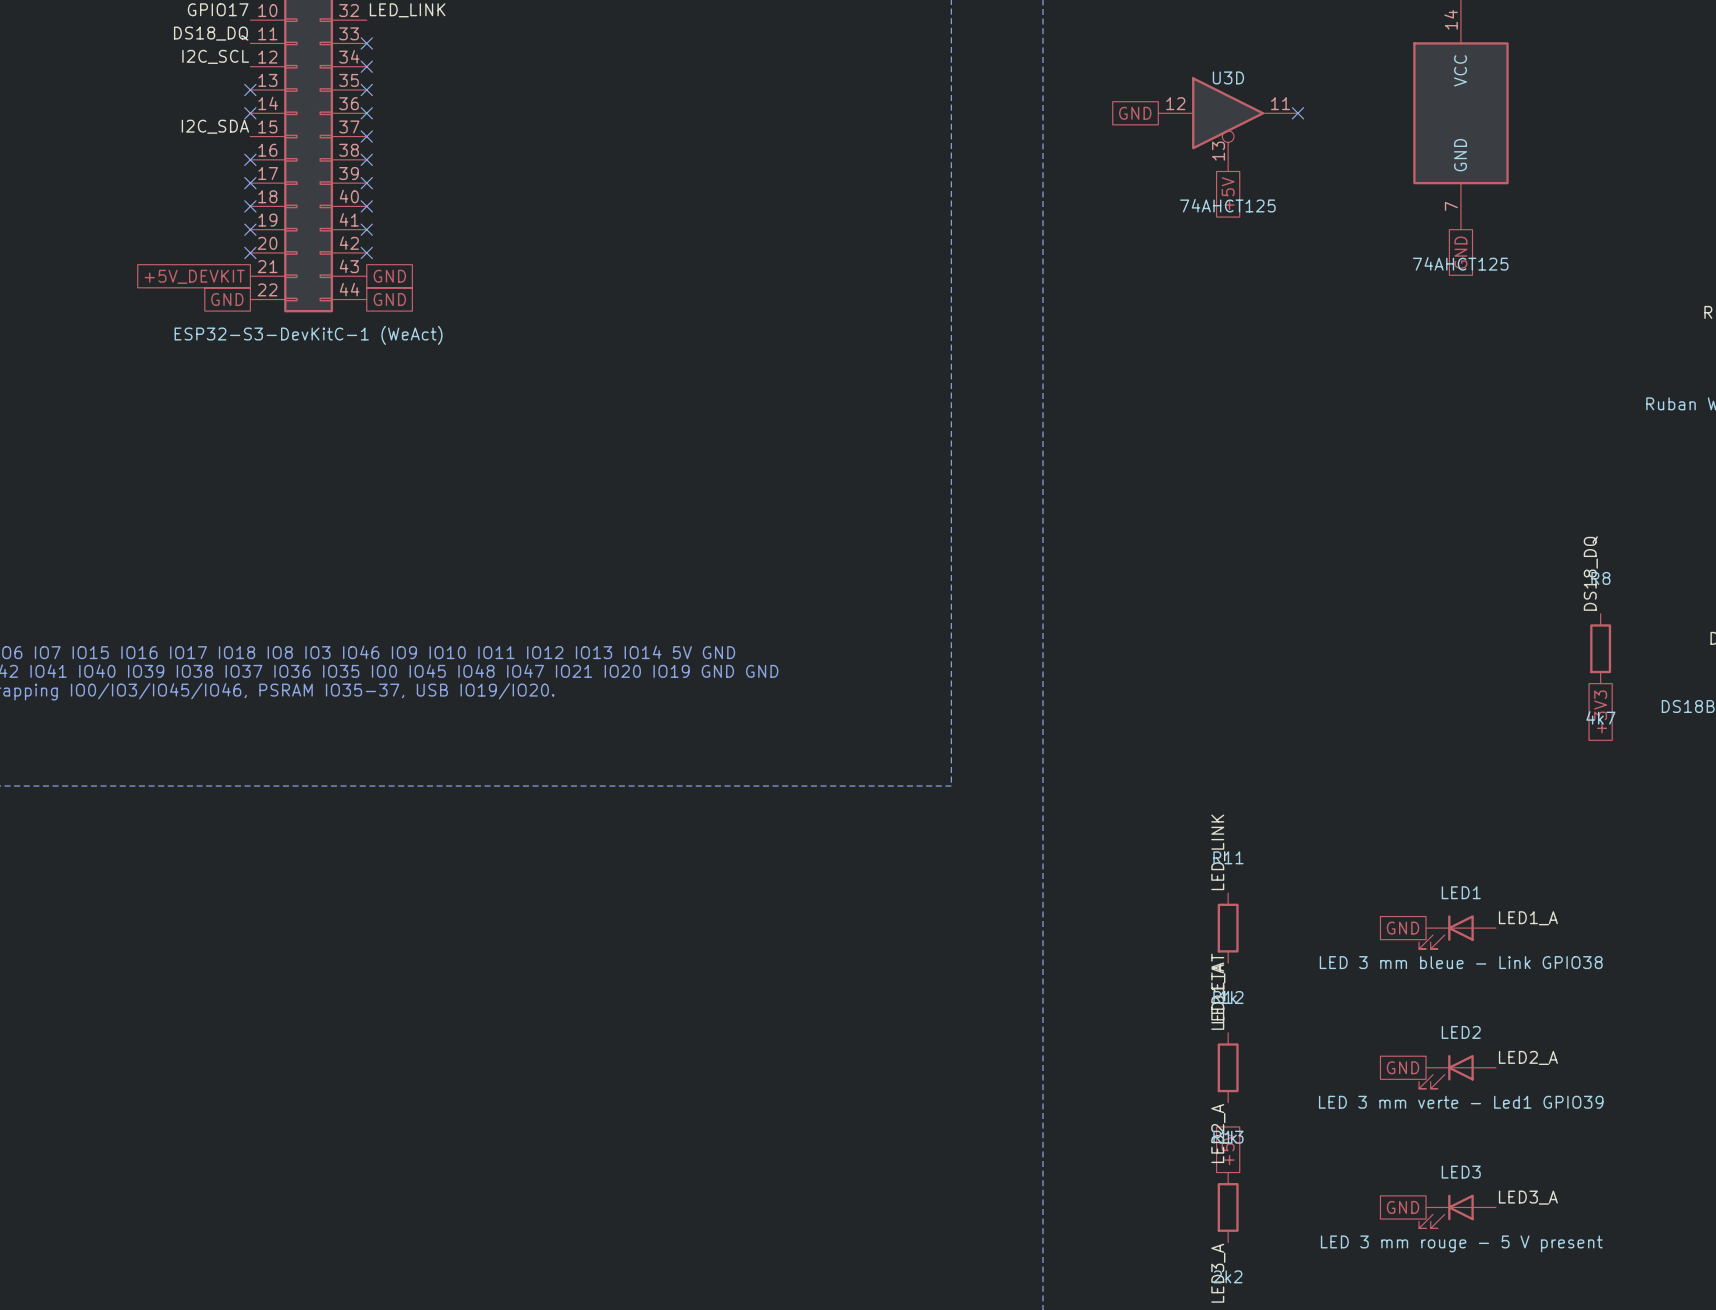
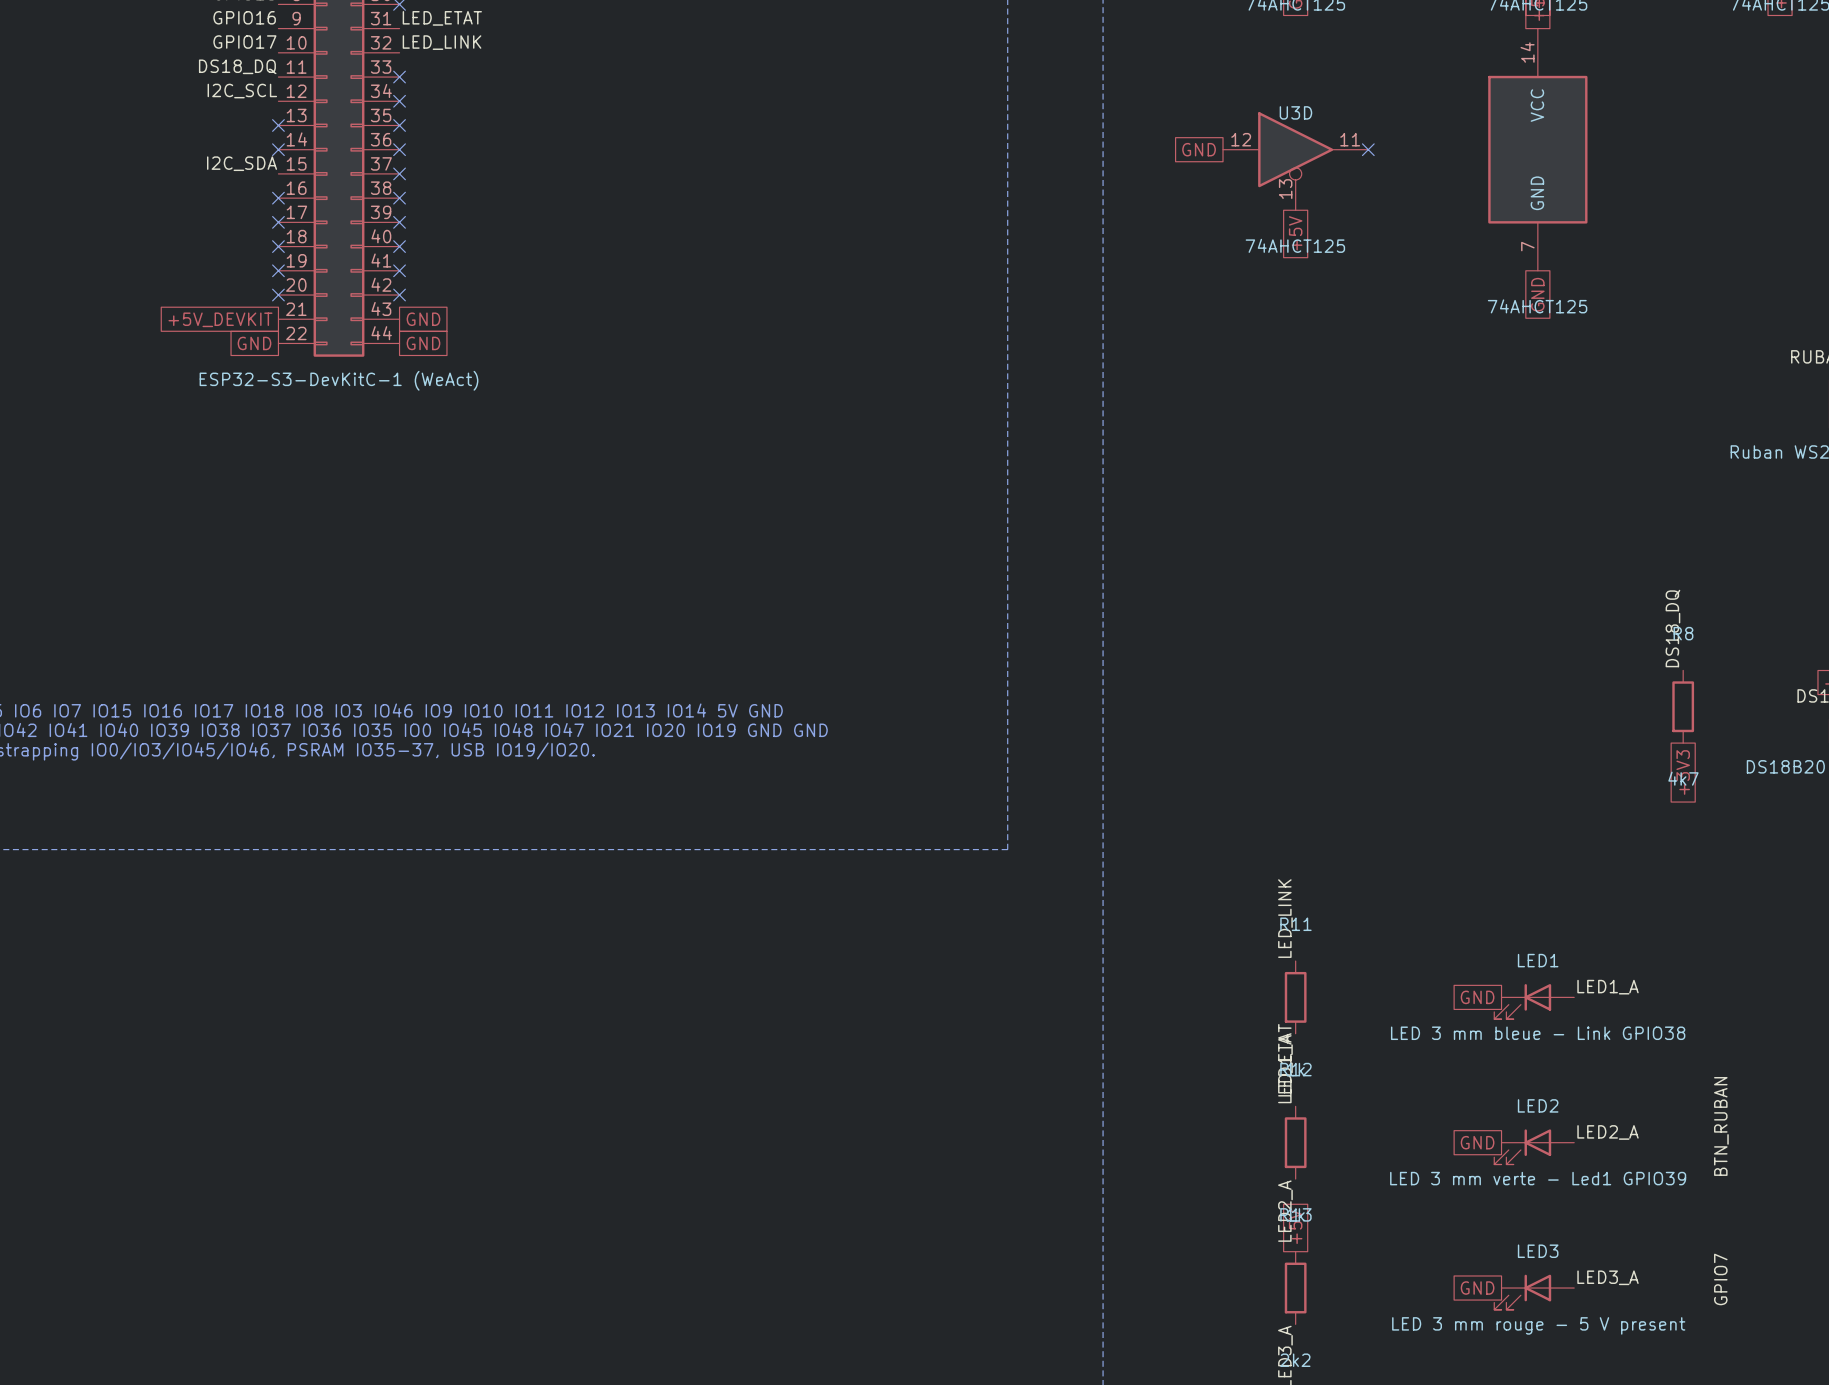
label: none -> BTN_RUBAN (1721, 1126)
label: none -> GPIO7 (1720, 1279)

